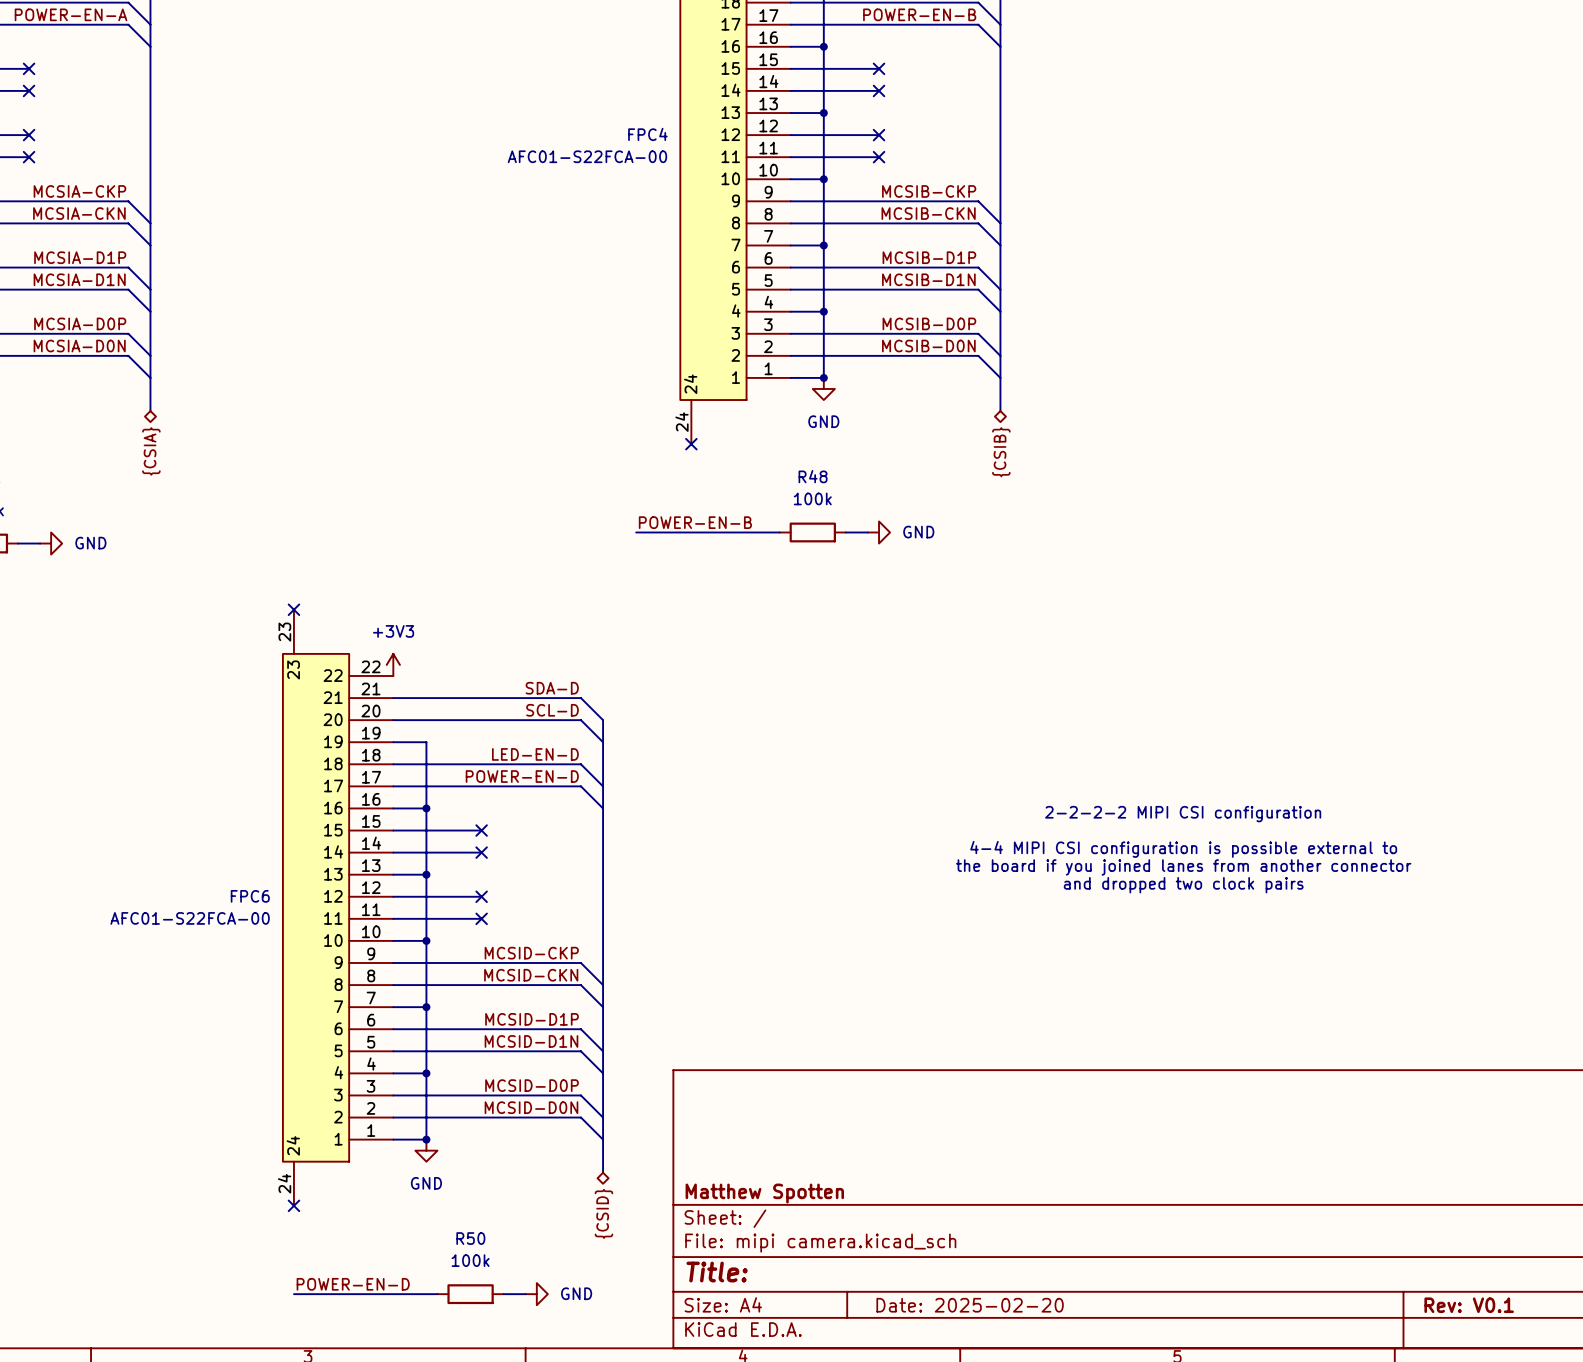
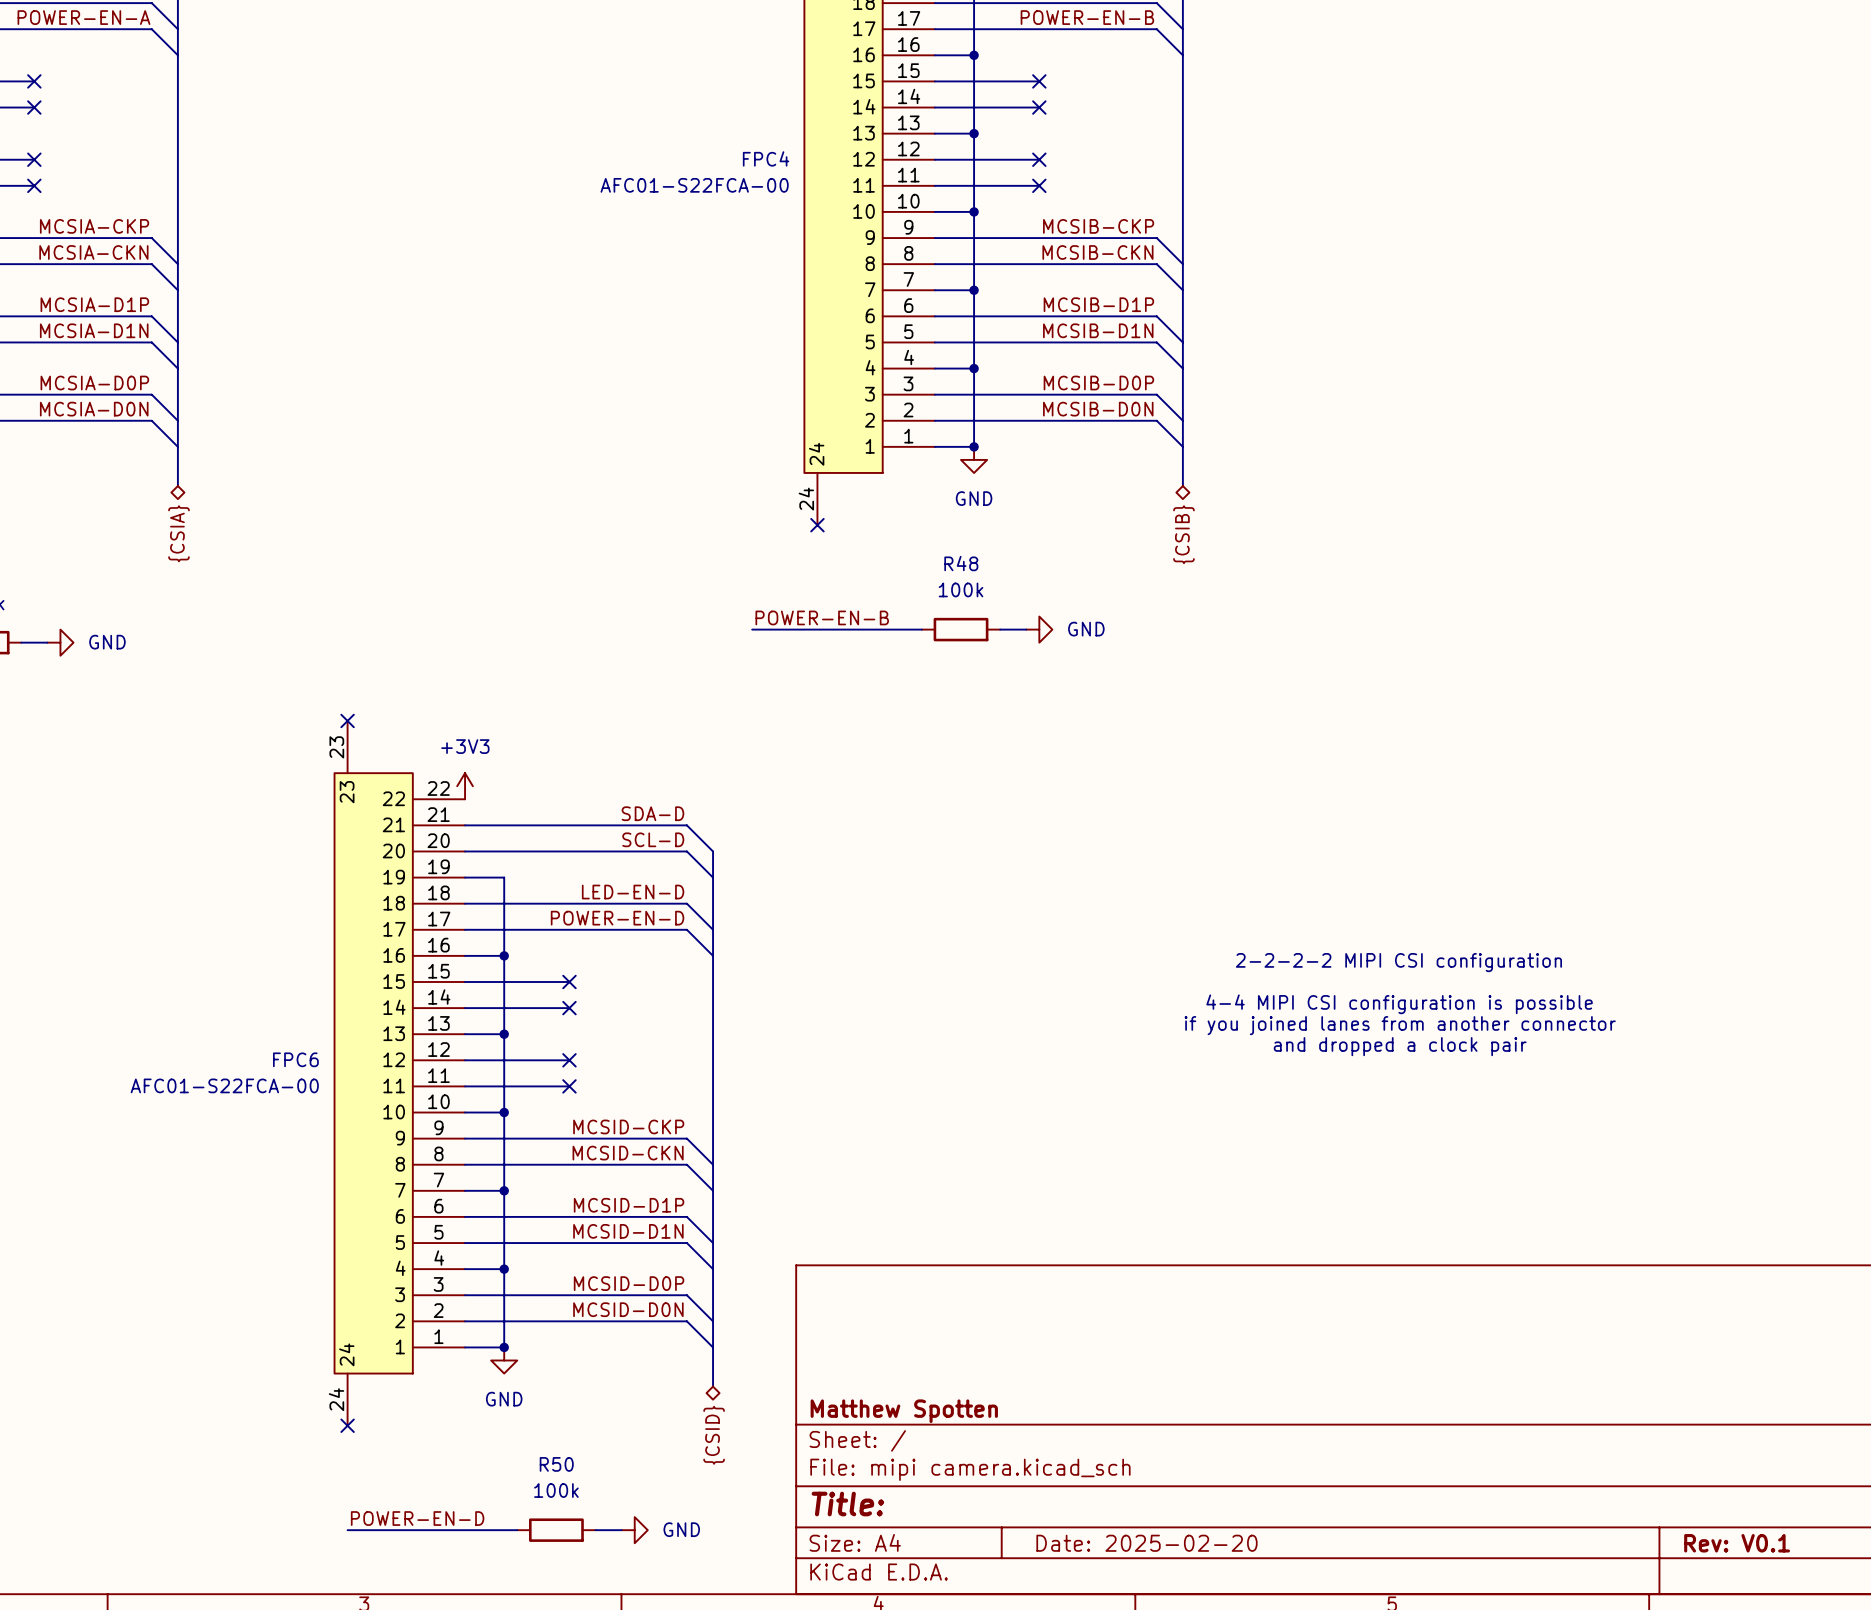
text: 4-4 MIPI CSI configuration is possible external to (1183, 849) -> 4-4 MIPI CSI configuration is possible (1399, 1004)
text: the board if you joined lanes from another connector (1183, 867) -> if you joined lanes from another connector (1400, 1025)
text: and dropped two clock pairs (1183, 885) -> and dropped a clock pair (1400, 1046)

